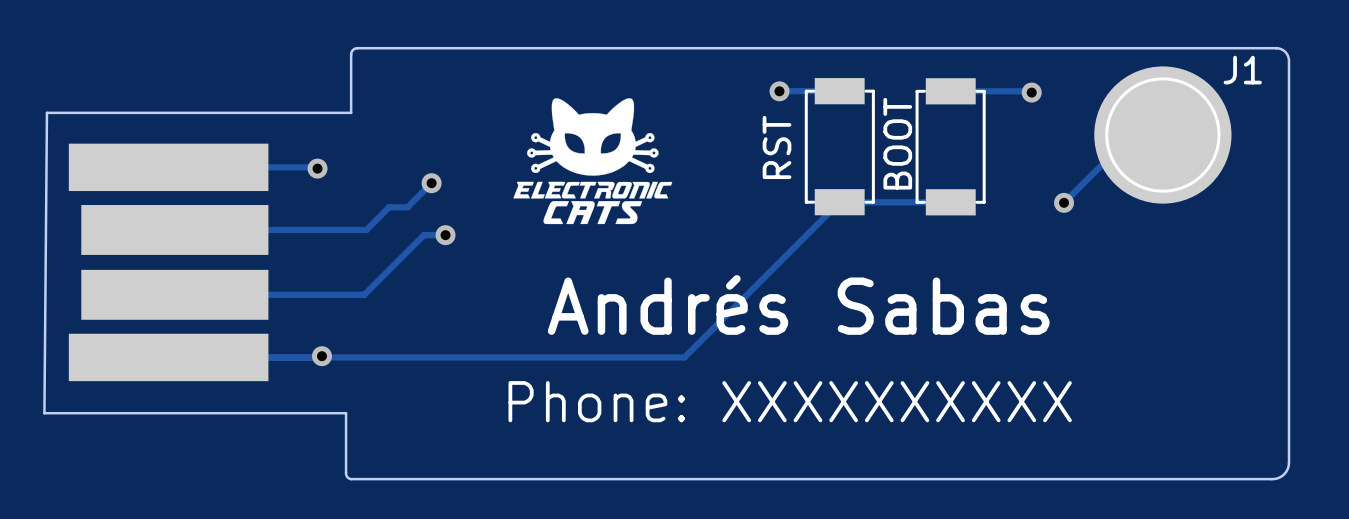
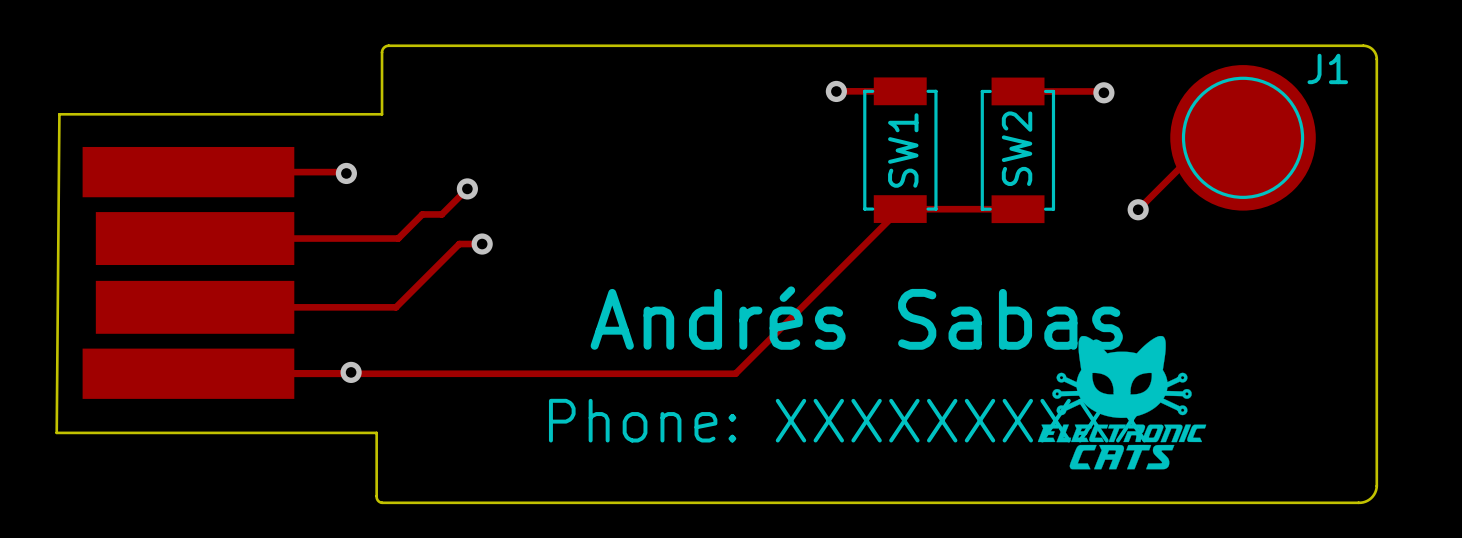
BOOT name: BOOT (897, 143) -> SW2 (1017, 148)
RST name: RST (777, 147) -> SW1 (903, 150)
drawing position: (592, 161) -> (1122, 402)

